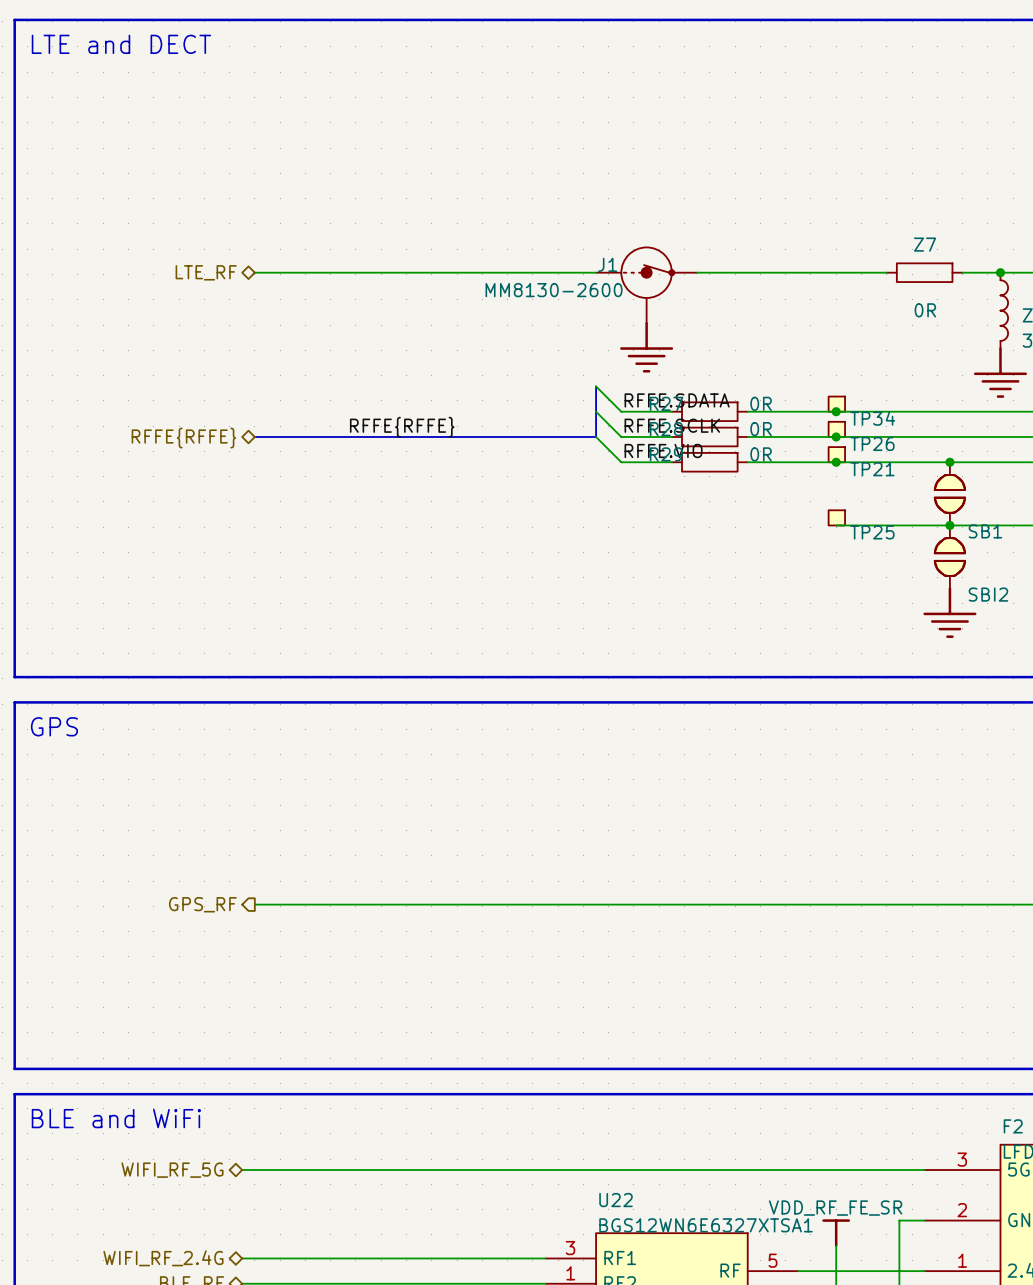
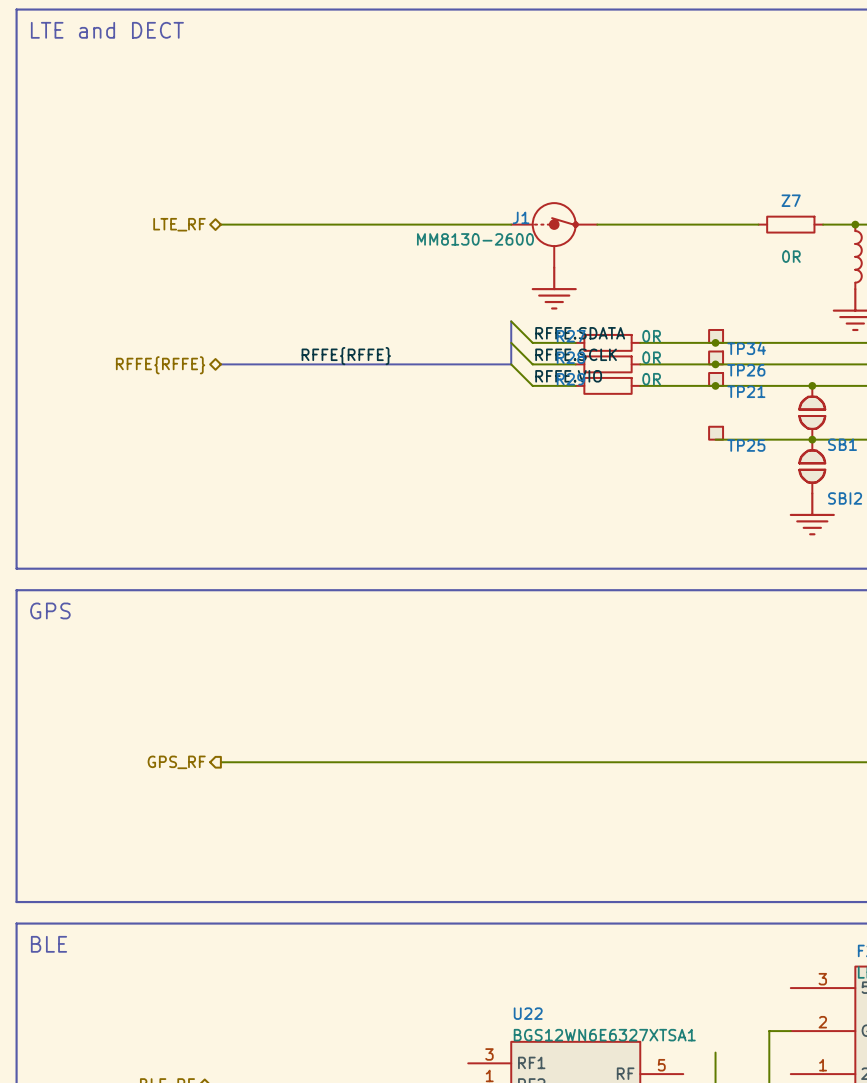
text: BLE and WiFi (116, 1118) -> BLE (48, 944)
hierarchical label: WIFI_RF_5G (172, 1170) -> none
wire: (242, 1170) (924, 1170) -> none
power symbol: VDD_RF_FE_SR (836, 1233) -> none
hierarchical label: WIFI_RF_2.4G (163, 1258) -> none
wire: (242, 1258) (545, 1258) -> none
wire: (798, 1271) (924, 1271) -> none

